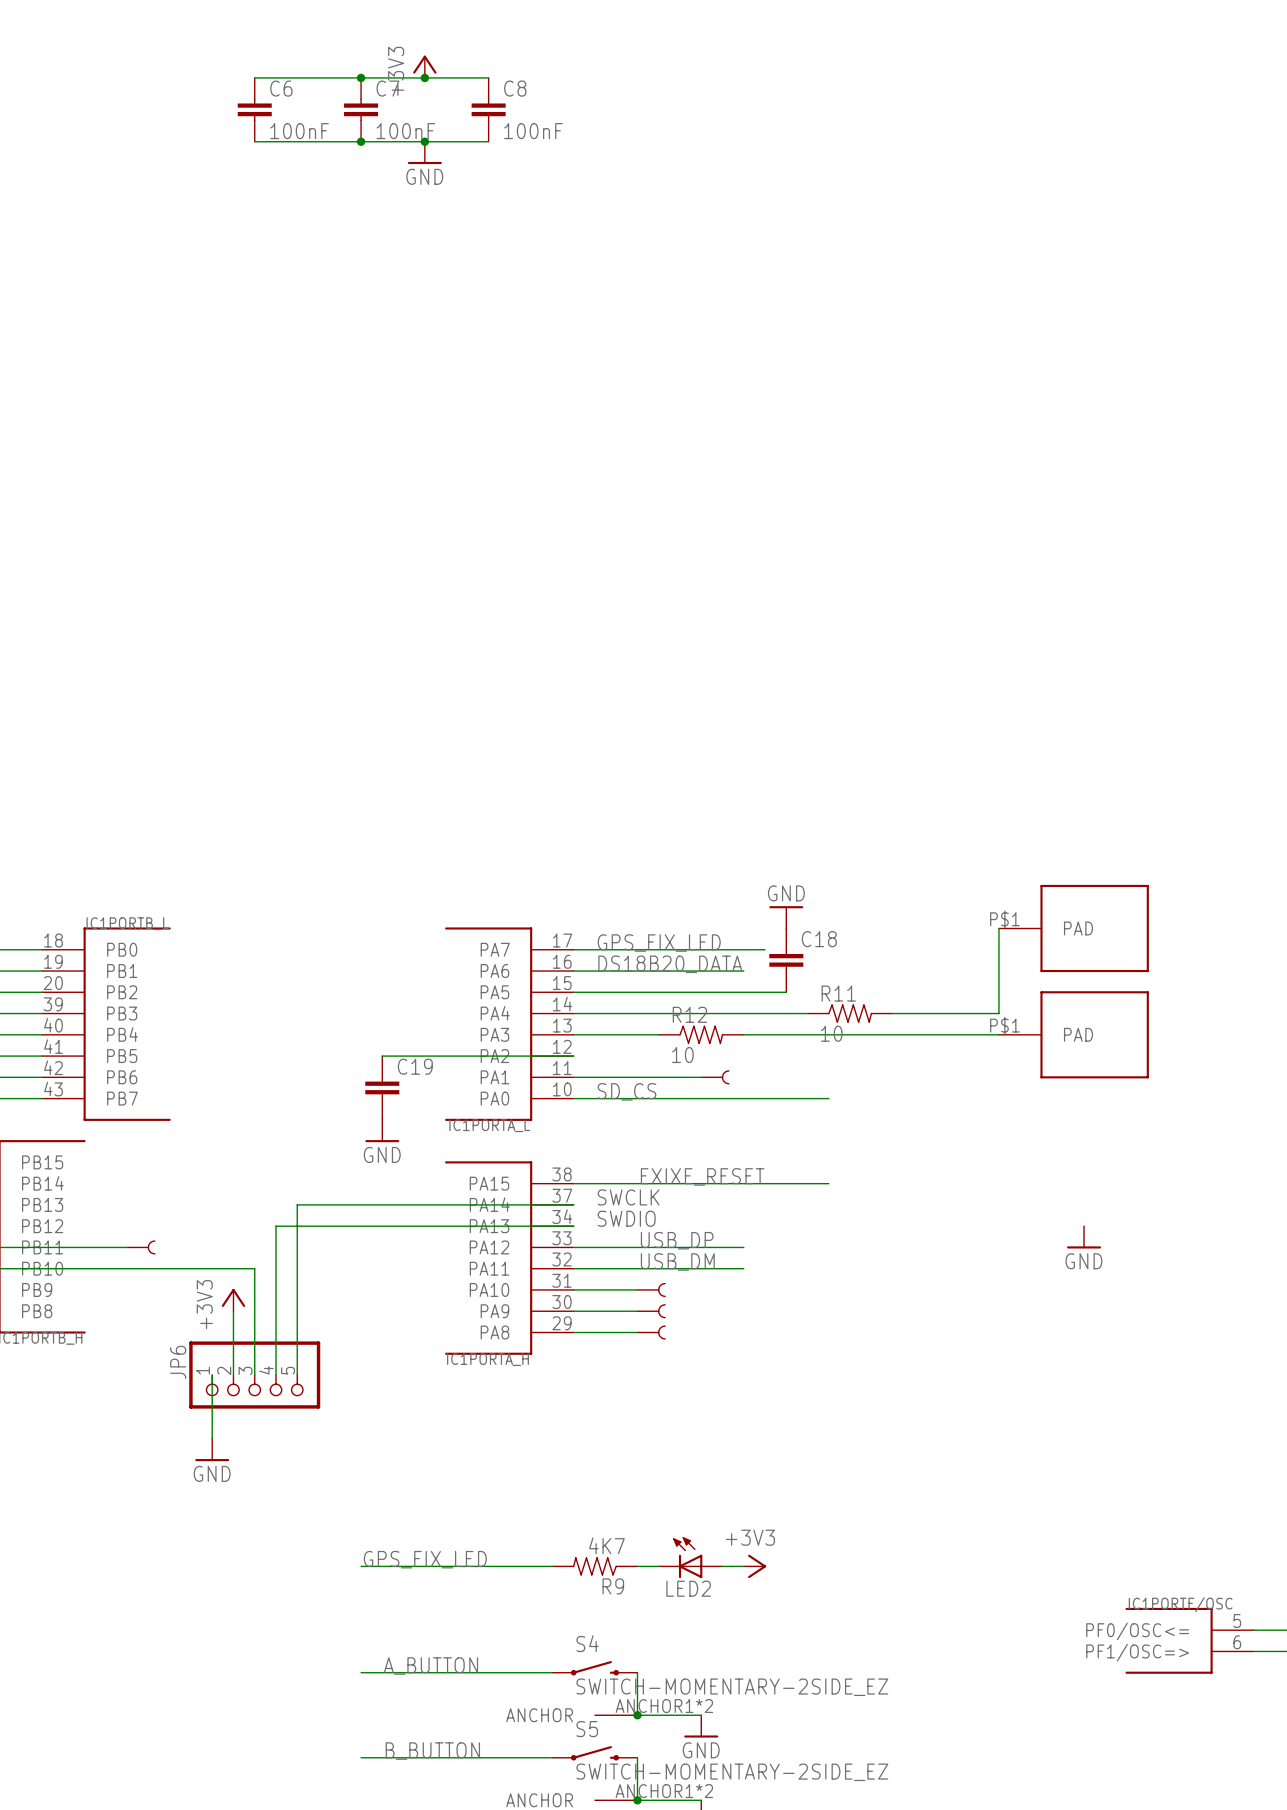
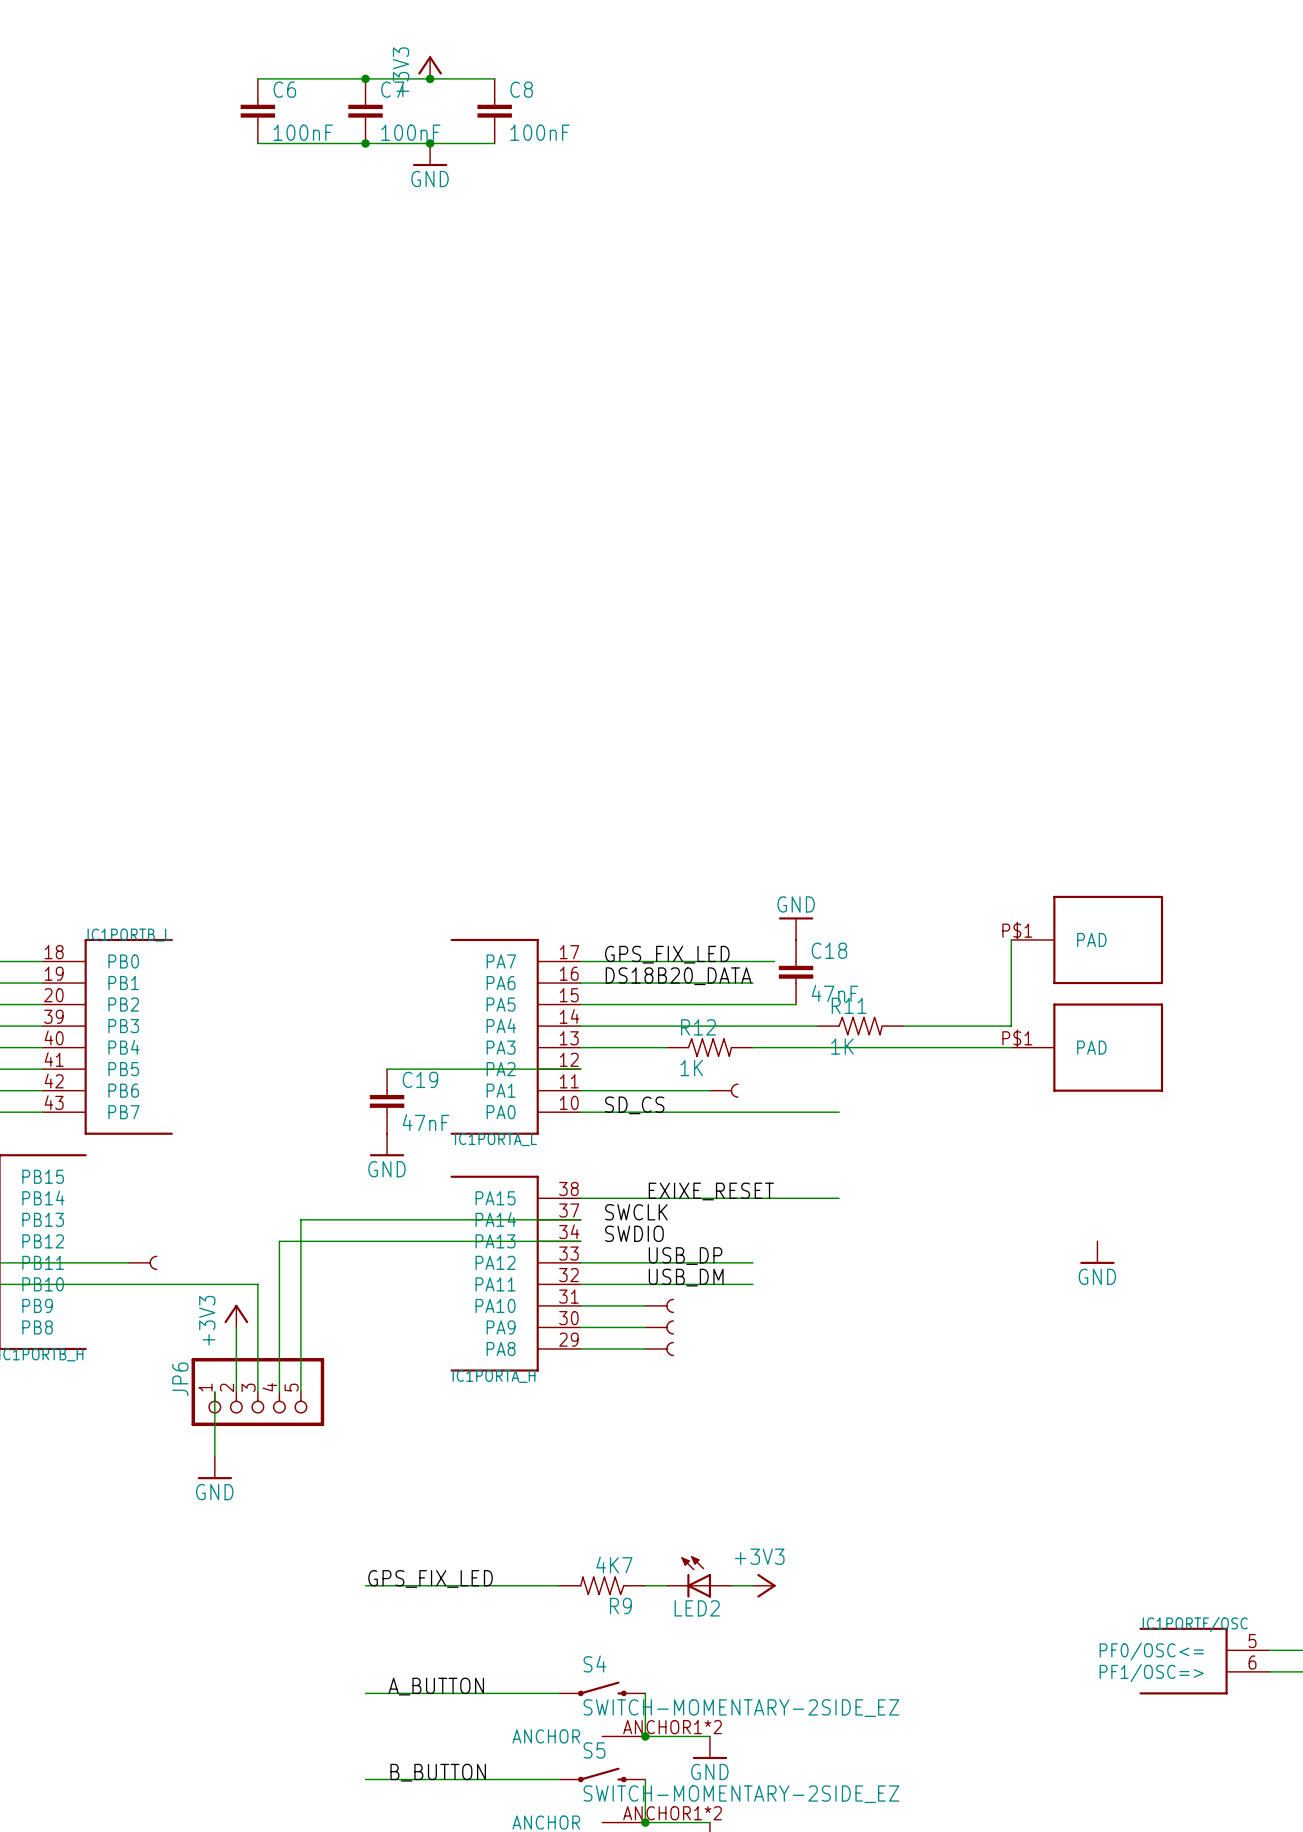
C18 value: none -> 47nF (834, 993)
R11 value: 10 (831, 1033) -> 1K (842, 1046)
R12 value: 10 (682, 1055) -> 1K (691, 1068)
C19 value: none -> 47nF (425, 1122)

